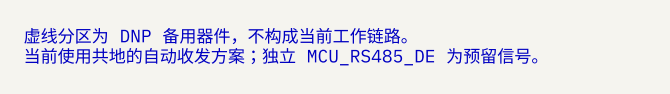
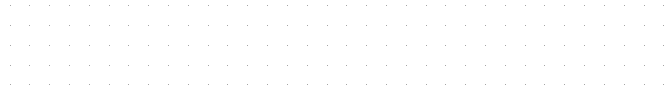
text: 虚线分区为 DNP 备用器件，不构成当前工作链路。 (215, 36) -> none
text: 当前使用共地的自动收发方案；独立 MCU_RS485_DE 为预留信号。 (281, 56) -> none

